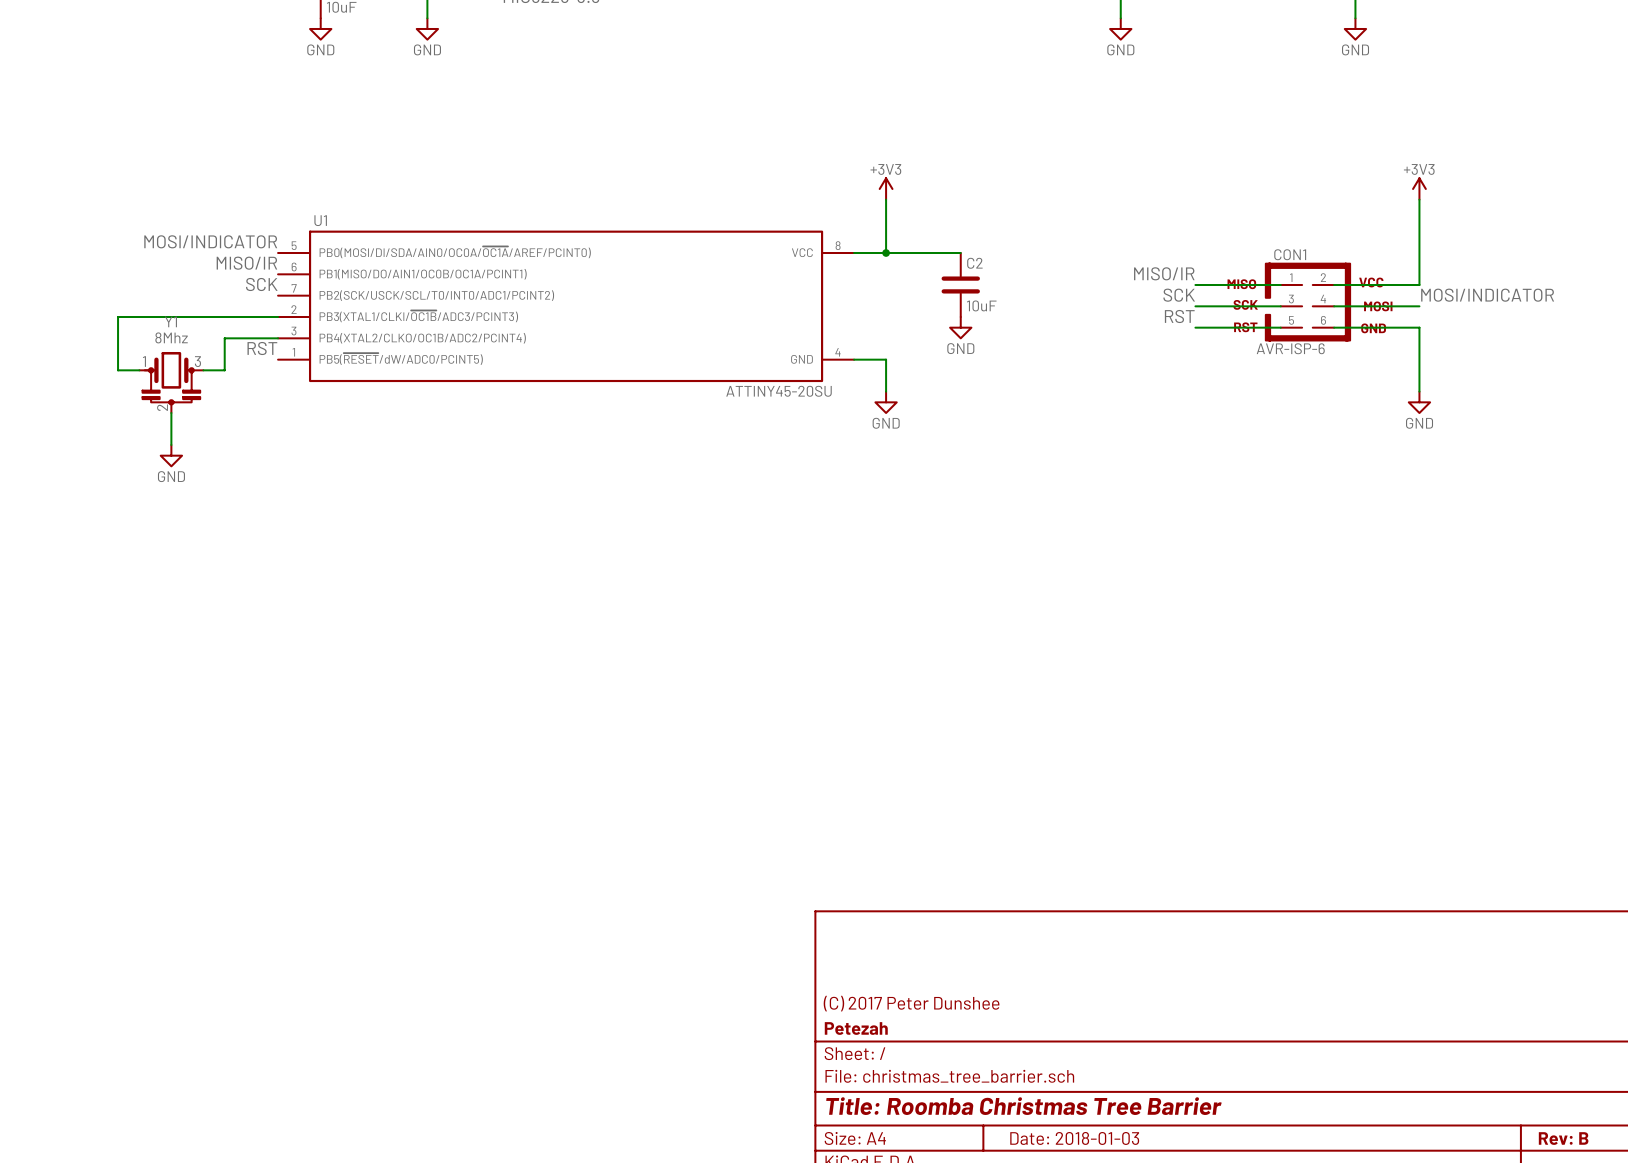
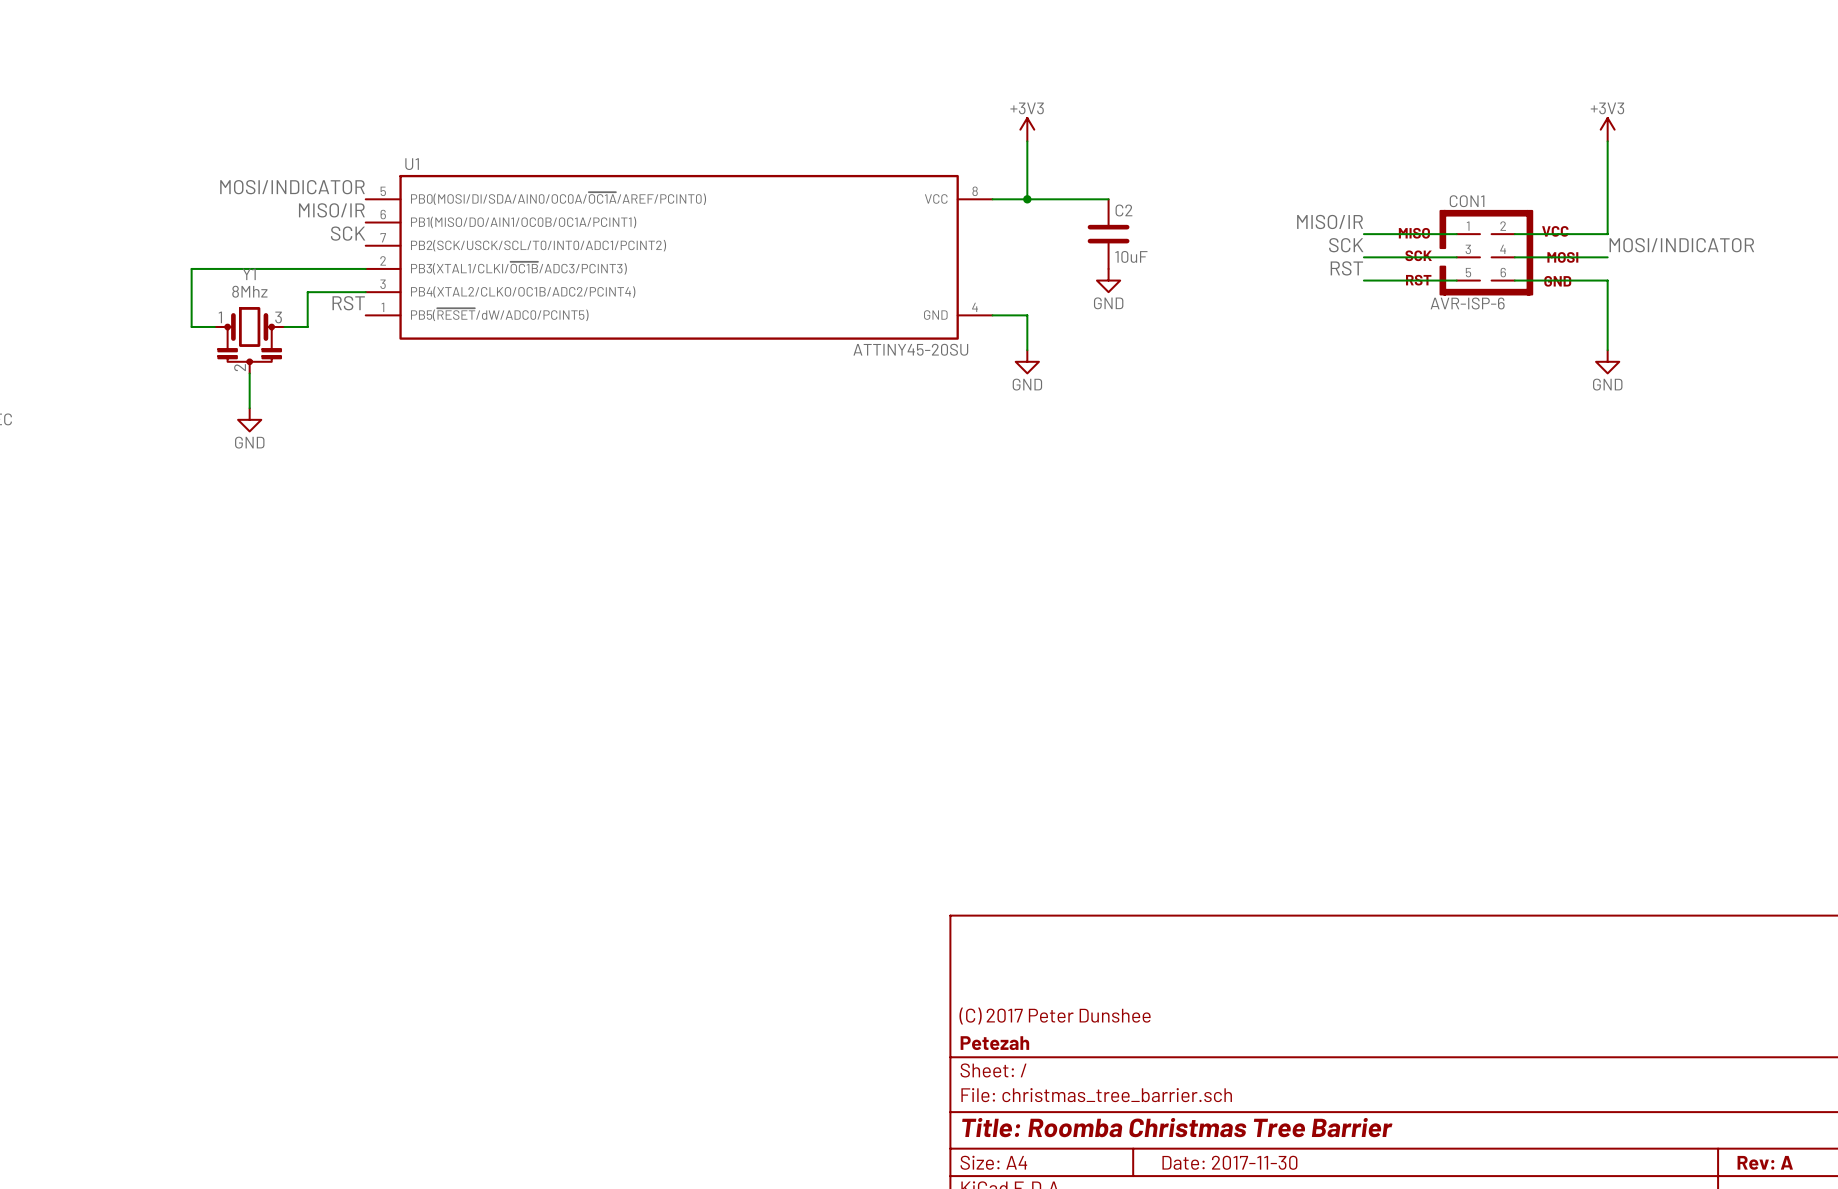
title block: Date: 2018-01-03 (1074, 1138) -> Date: 2017-11-30 (1229, 1162)
title block: Rev: B (1563, 1138) -> Rev: A (1765, 1162)

